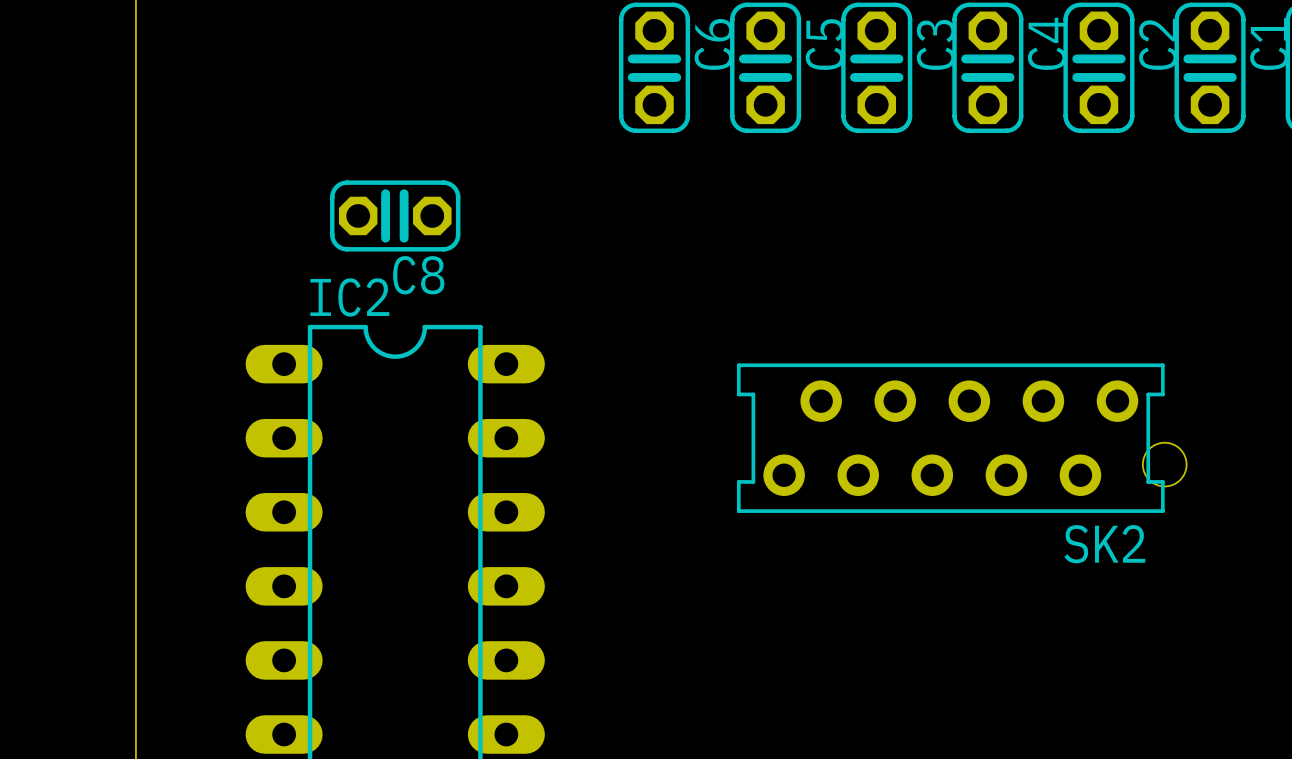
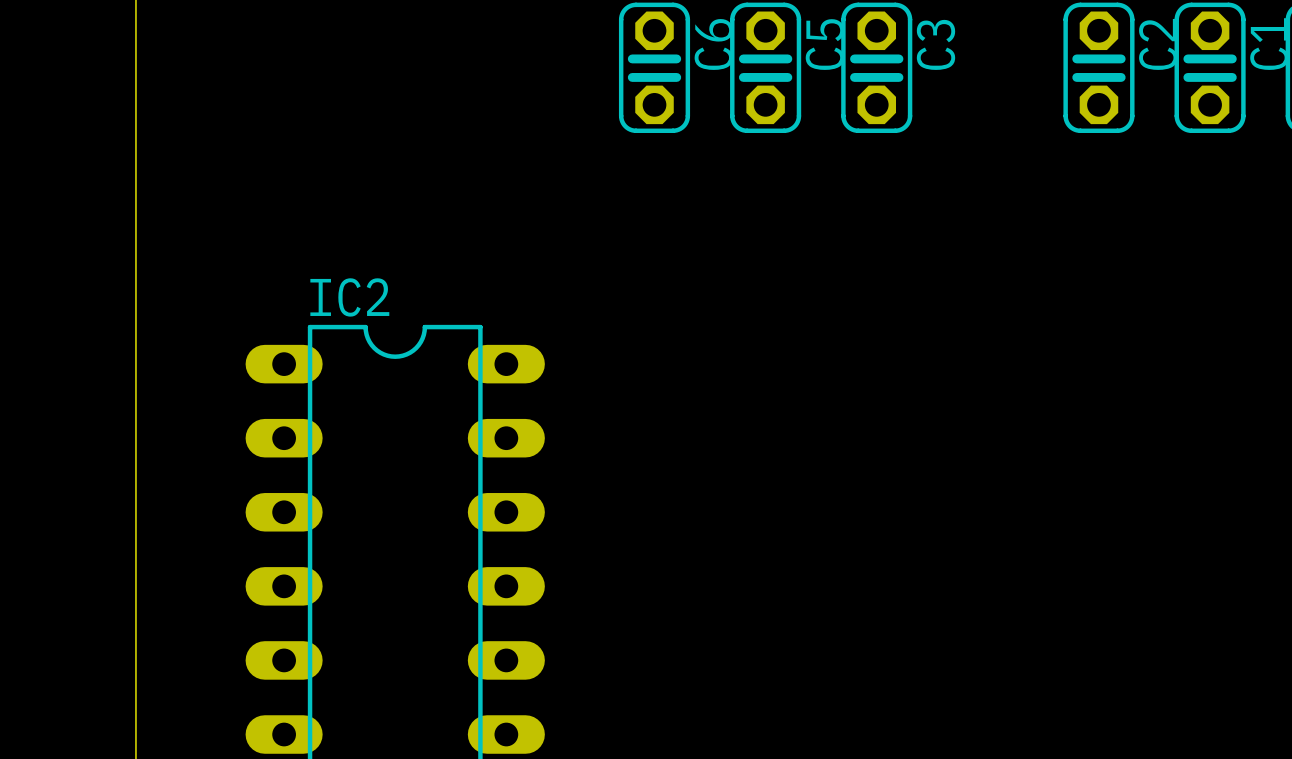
C4: (987, 67) -> none
C8: (395, 215) -> none
SK2: (961, 438) -> none

